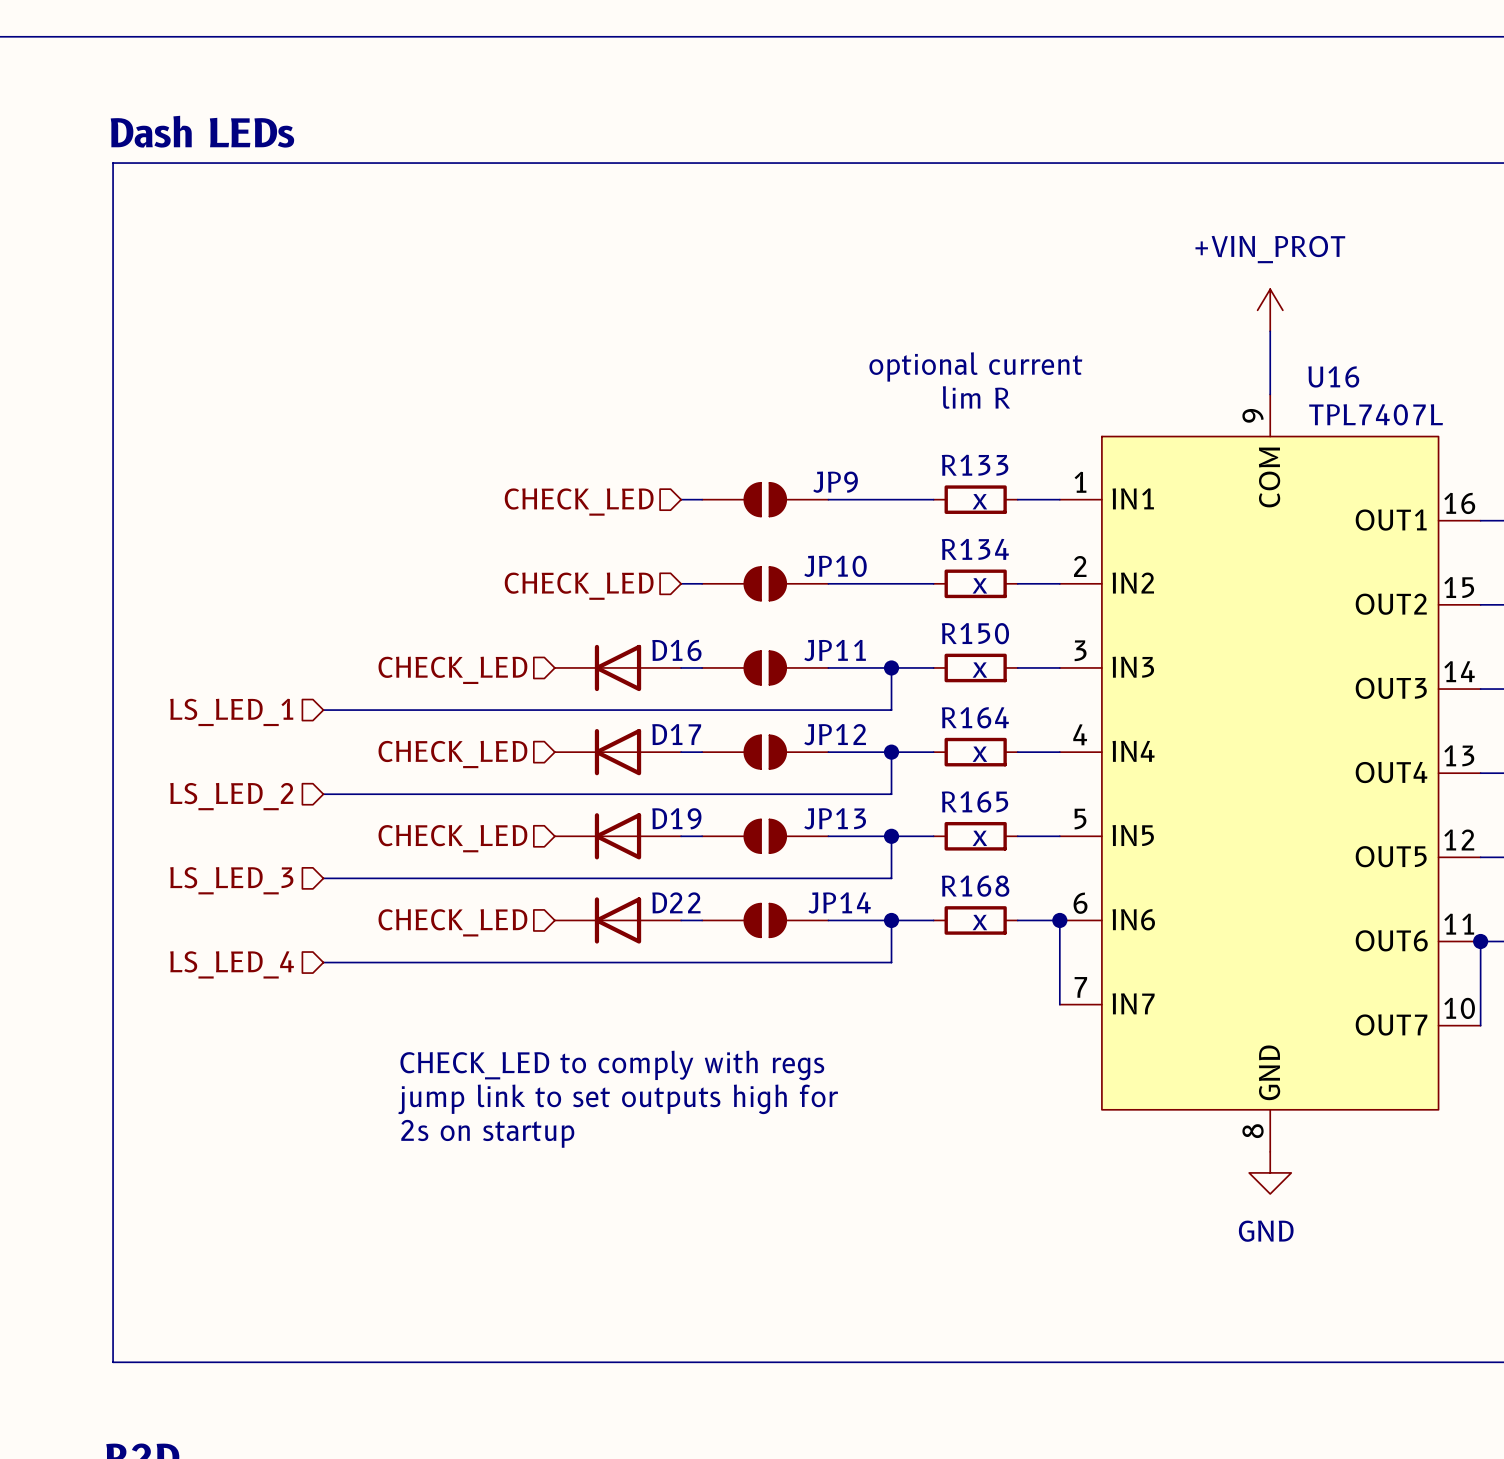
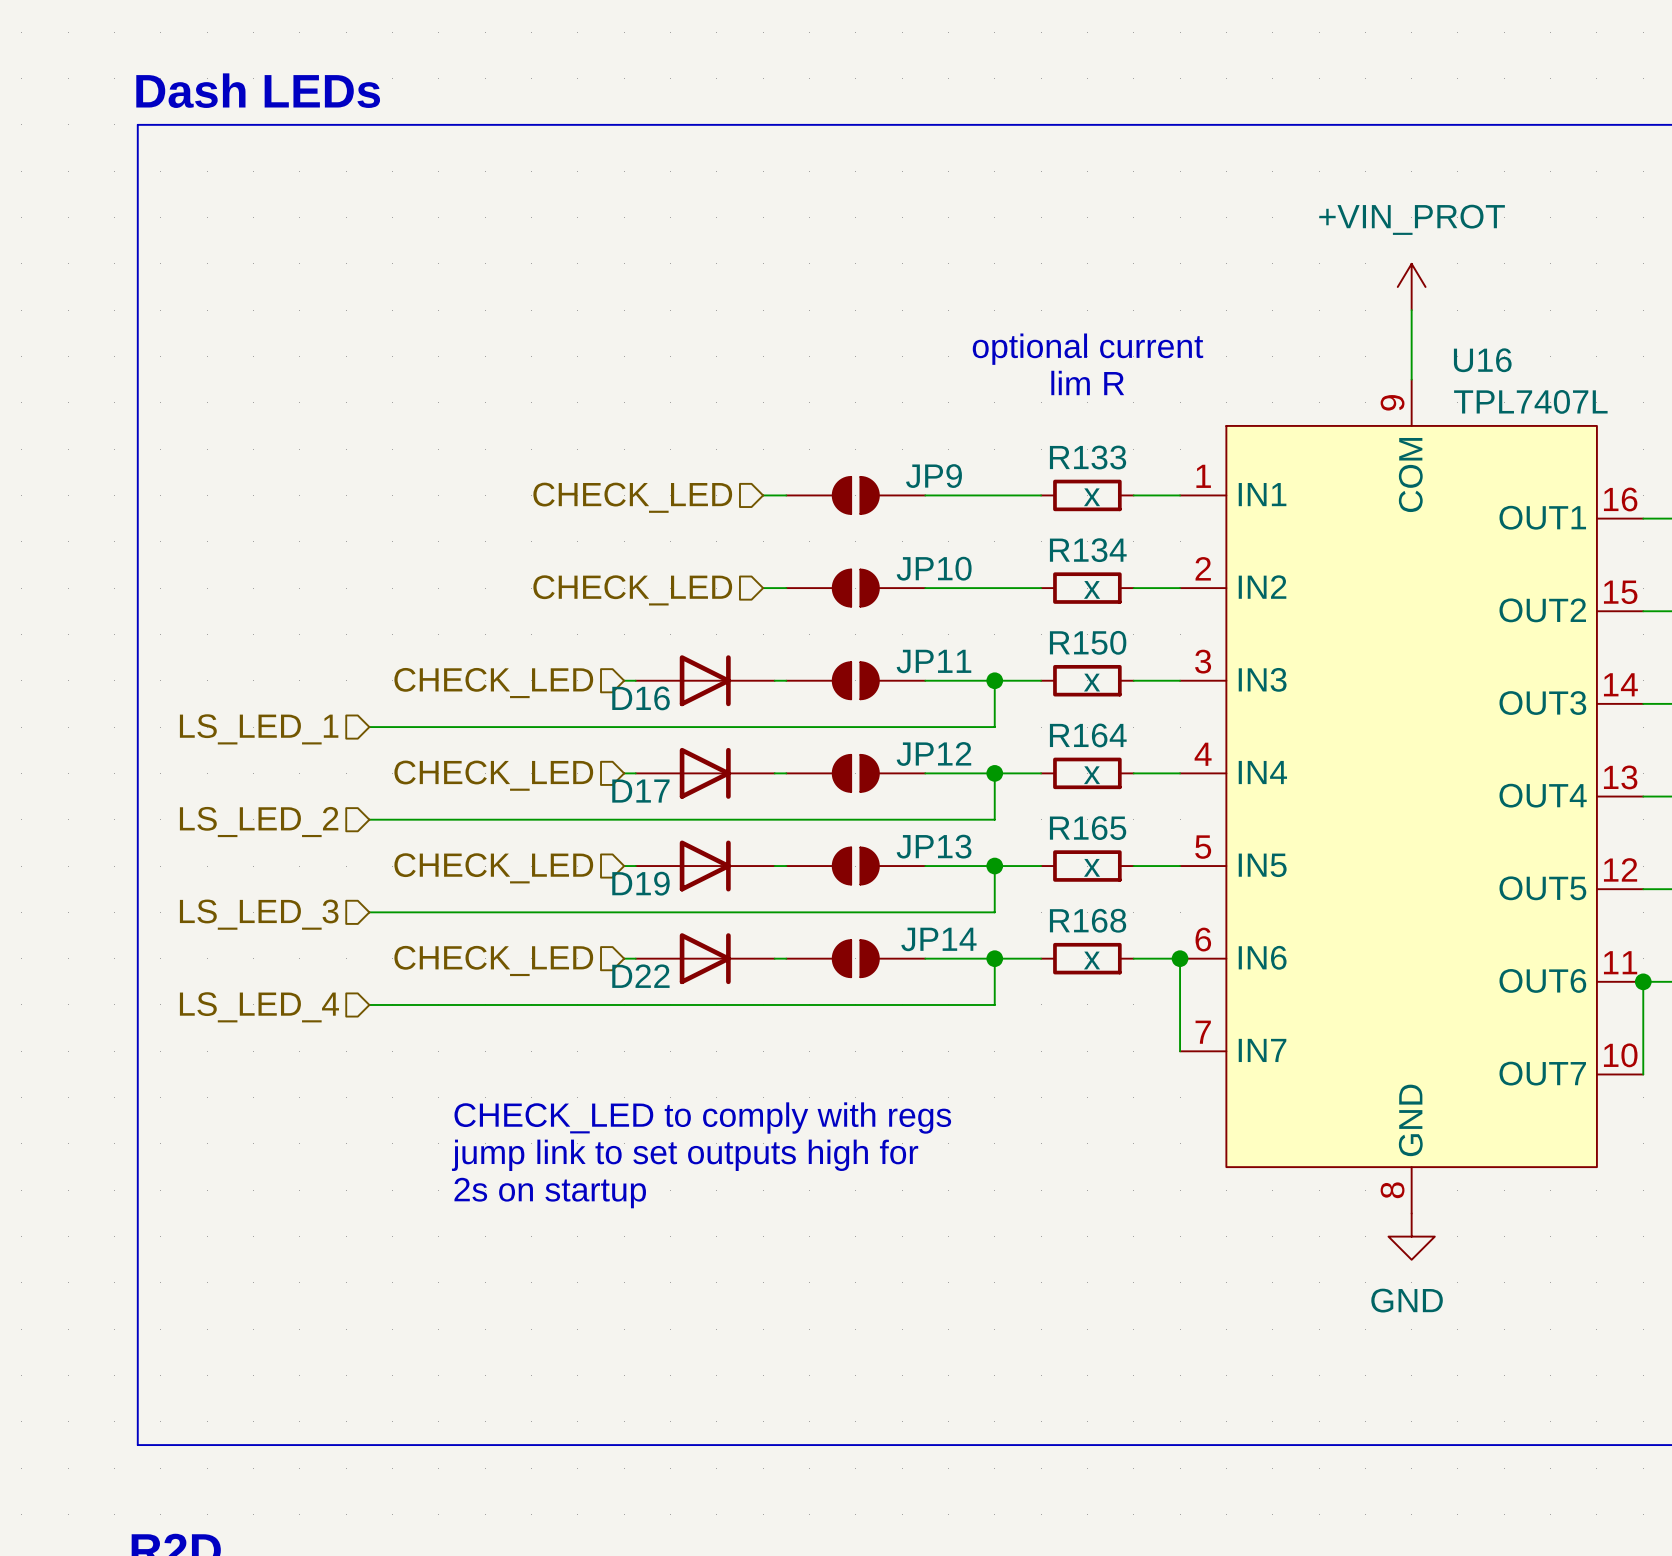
D16 rotation: 0° (618, 667) -> 180° (705, 680)
D17 rotation: 0° (618, 752) -> 180° (705, 773)
D19 rotation: 0° (618, 836) -> 180° (705, 866)
D22 rotation: 0° (618, 920) -> 180° (705, 958)

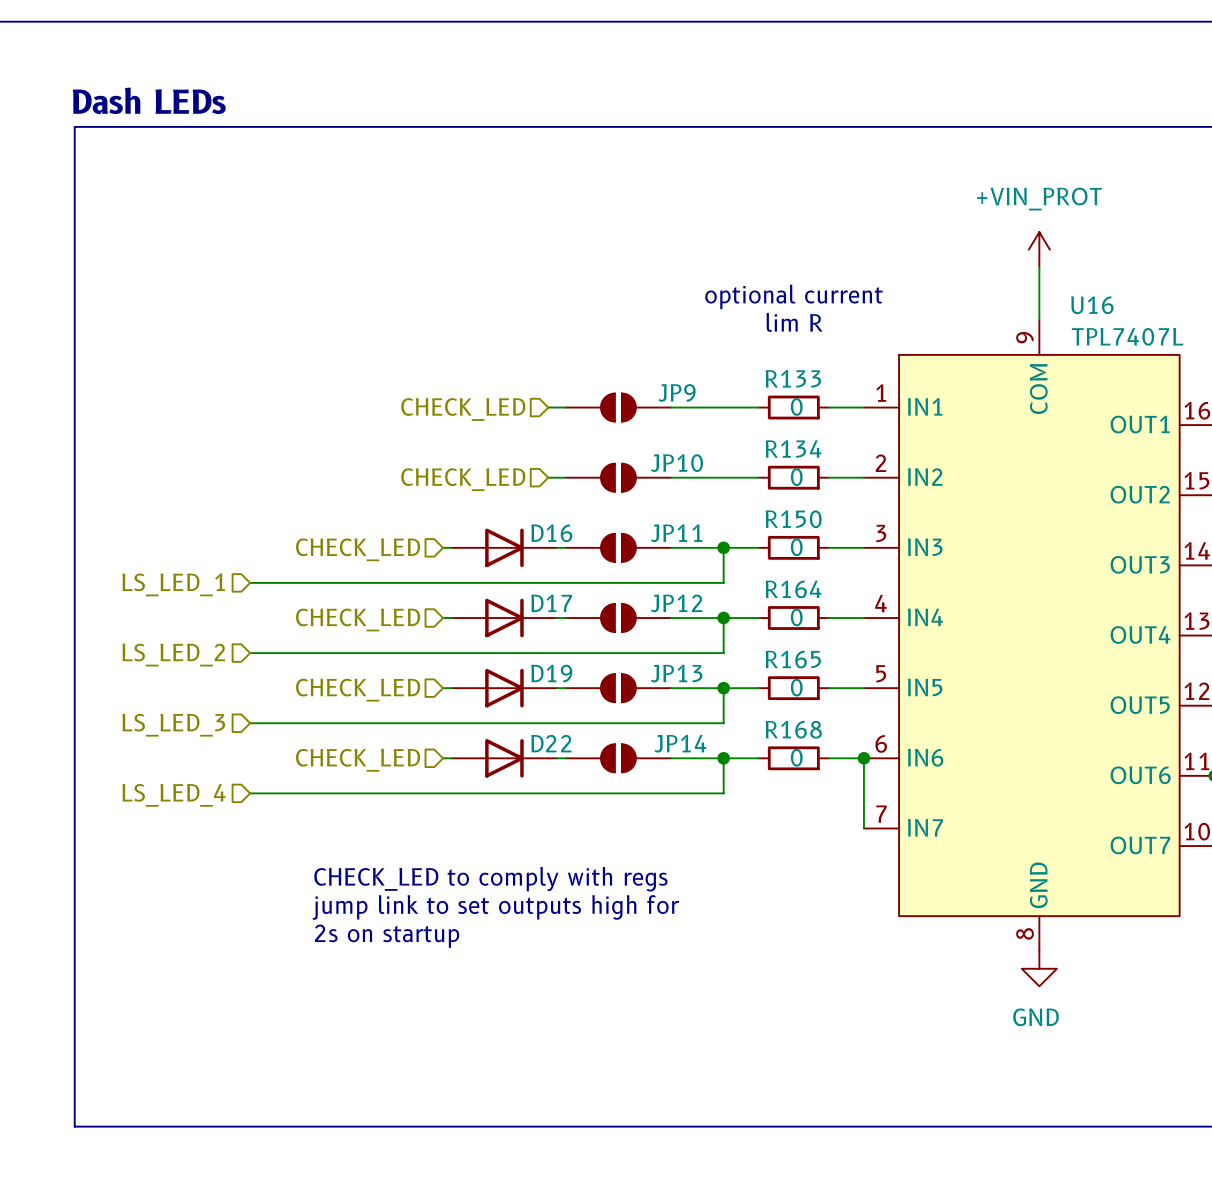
R133 value: x (1092, 497) -> 0 (796, 407)
R134 value: x (1092, 589) -> 0 (796, 477)
R150 value: x (1092, 682) -> 0 (796, 547)
D16 name position: D16 (641, 698) -> D16 (551, 533)
R164 value: x (1092, 775) -> 0 (796, 617)
D17 name position: D17 (640, 791) -> D17 (551, 603)
R165 value: x (1092, 867) -> 0 (796, 687)
D19 name position: D19 (640, 883) -> D19 (551, 673)
R168 value: x (1092, 960) -> 0 (796, 757)
D22 name position: D22 (640, 976) -> D22 (551, 743)

